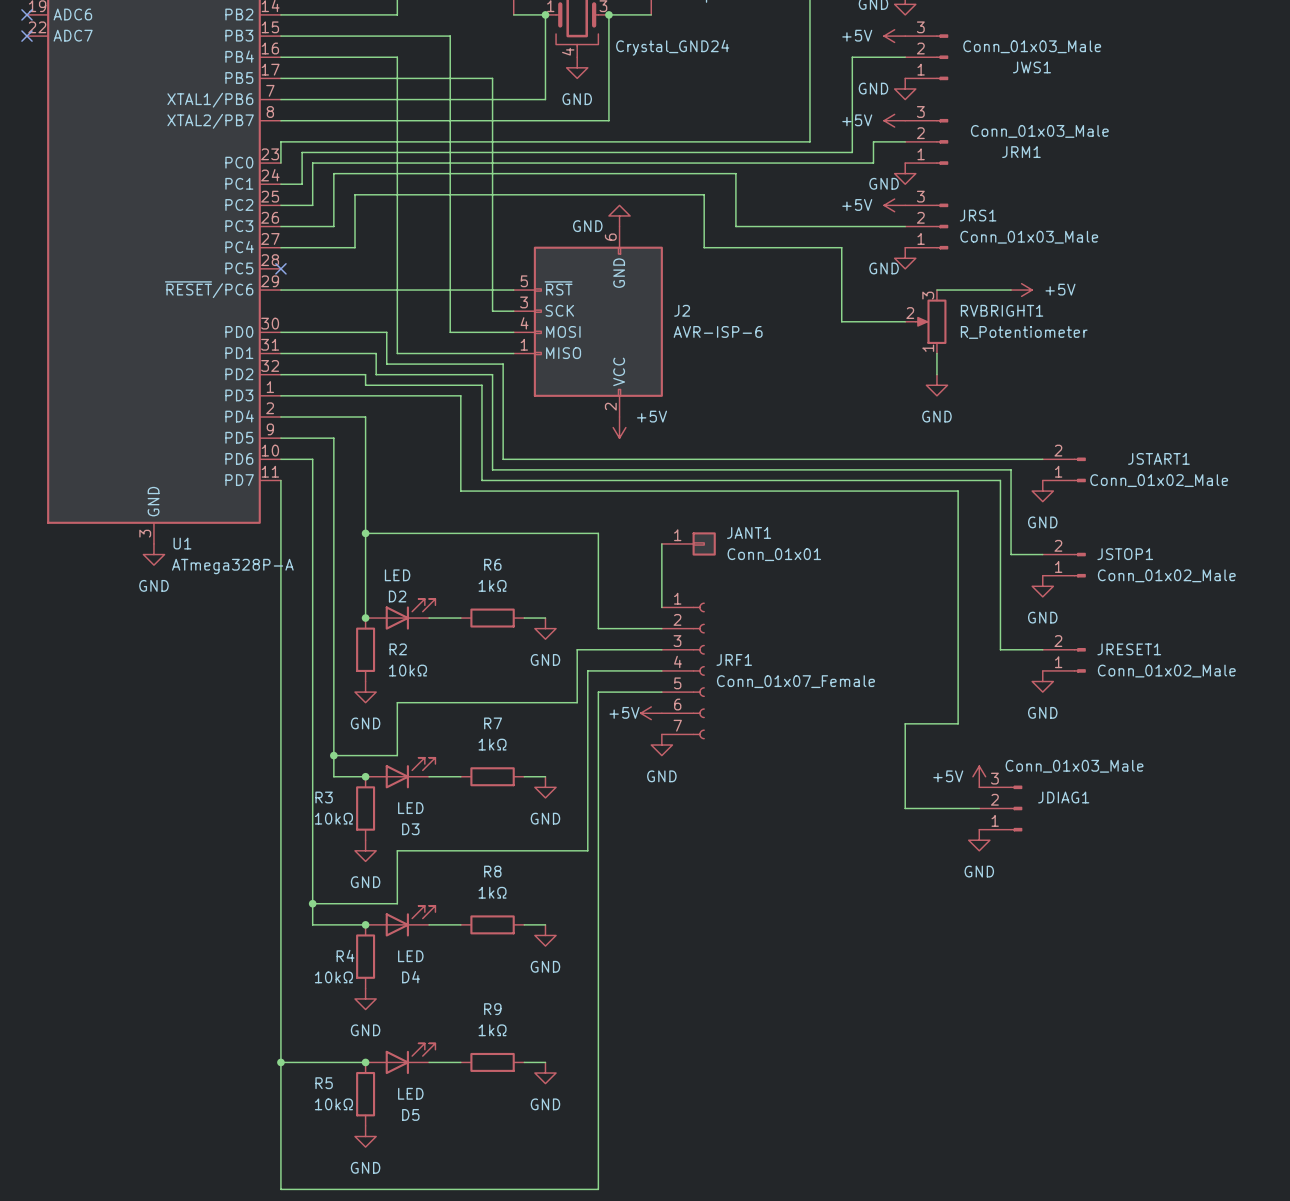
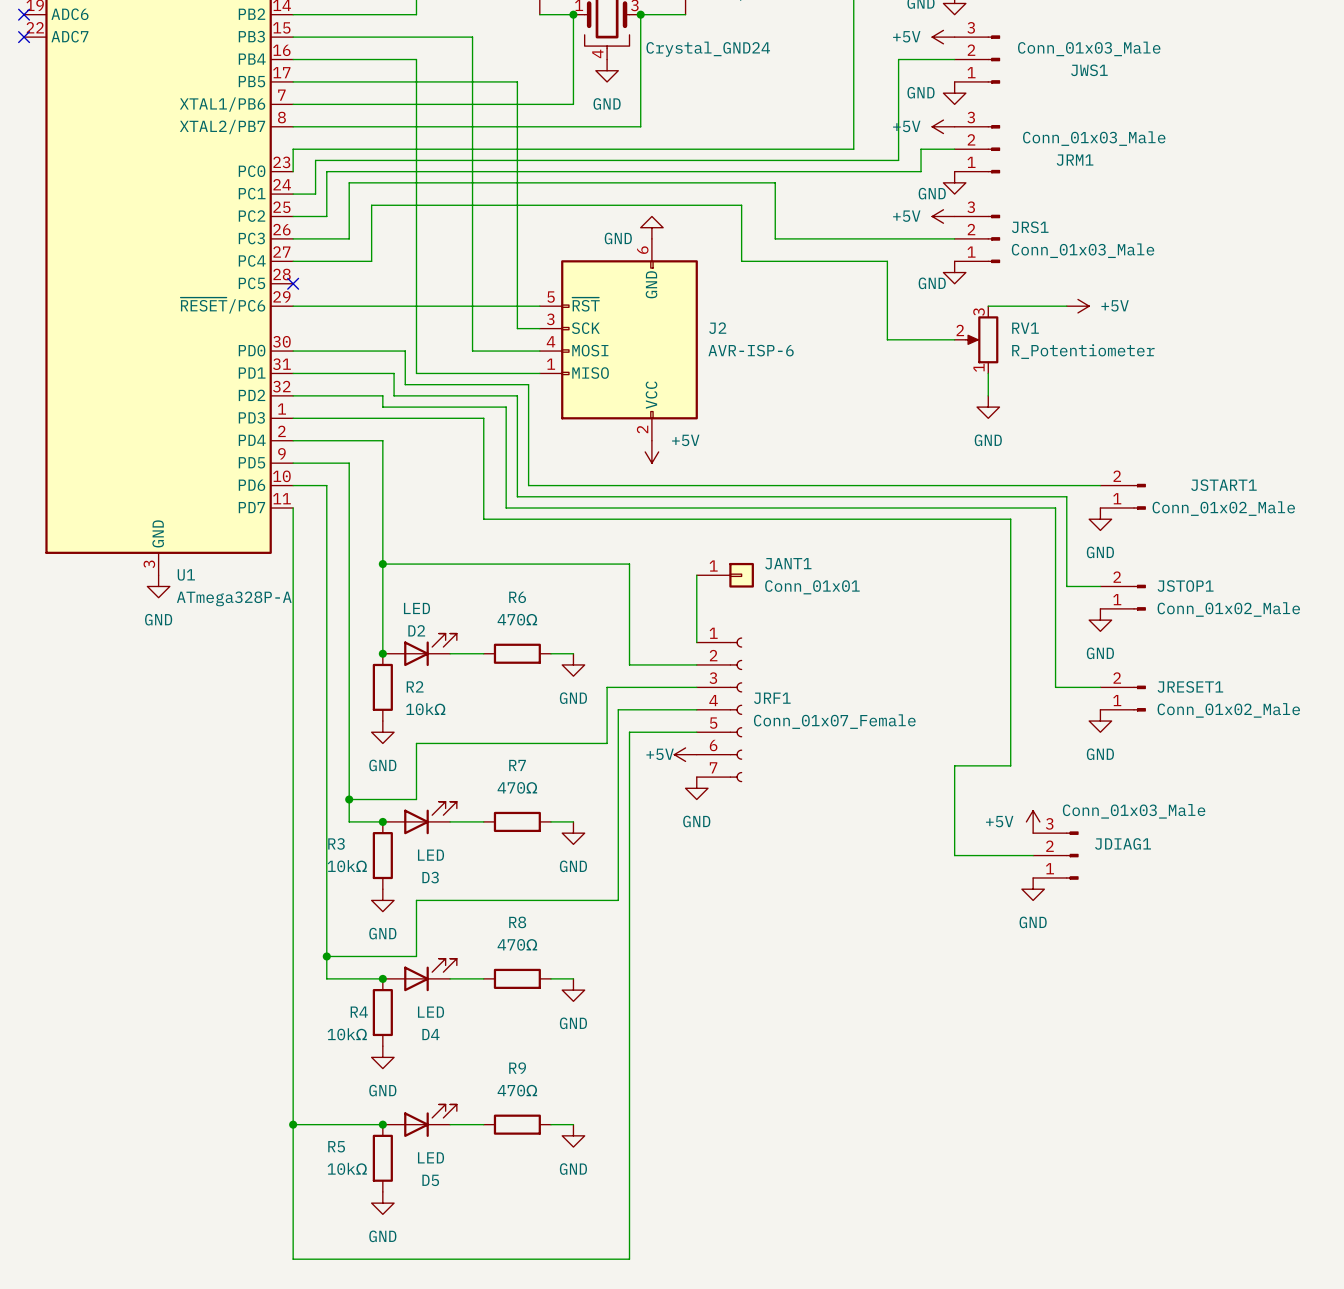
RVBRIGHT1 name: RVBRIGHT1 (1002, 310) -> RV1 (1025, 328)
R6 value: 1kΩ (492, 585) -> 470Ω (517, 619)
R7 value: 1kΩ (492, 744) -> 470Ω (517, 787)
R8 value: 1kΩ (492, 892) -> 470Ω (517, 944)
R9 value: 1kΩ (492, 1030) -> 470Ω (517, 1090)

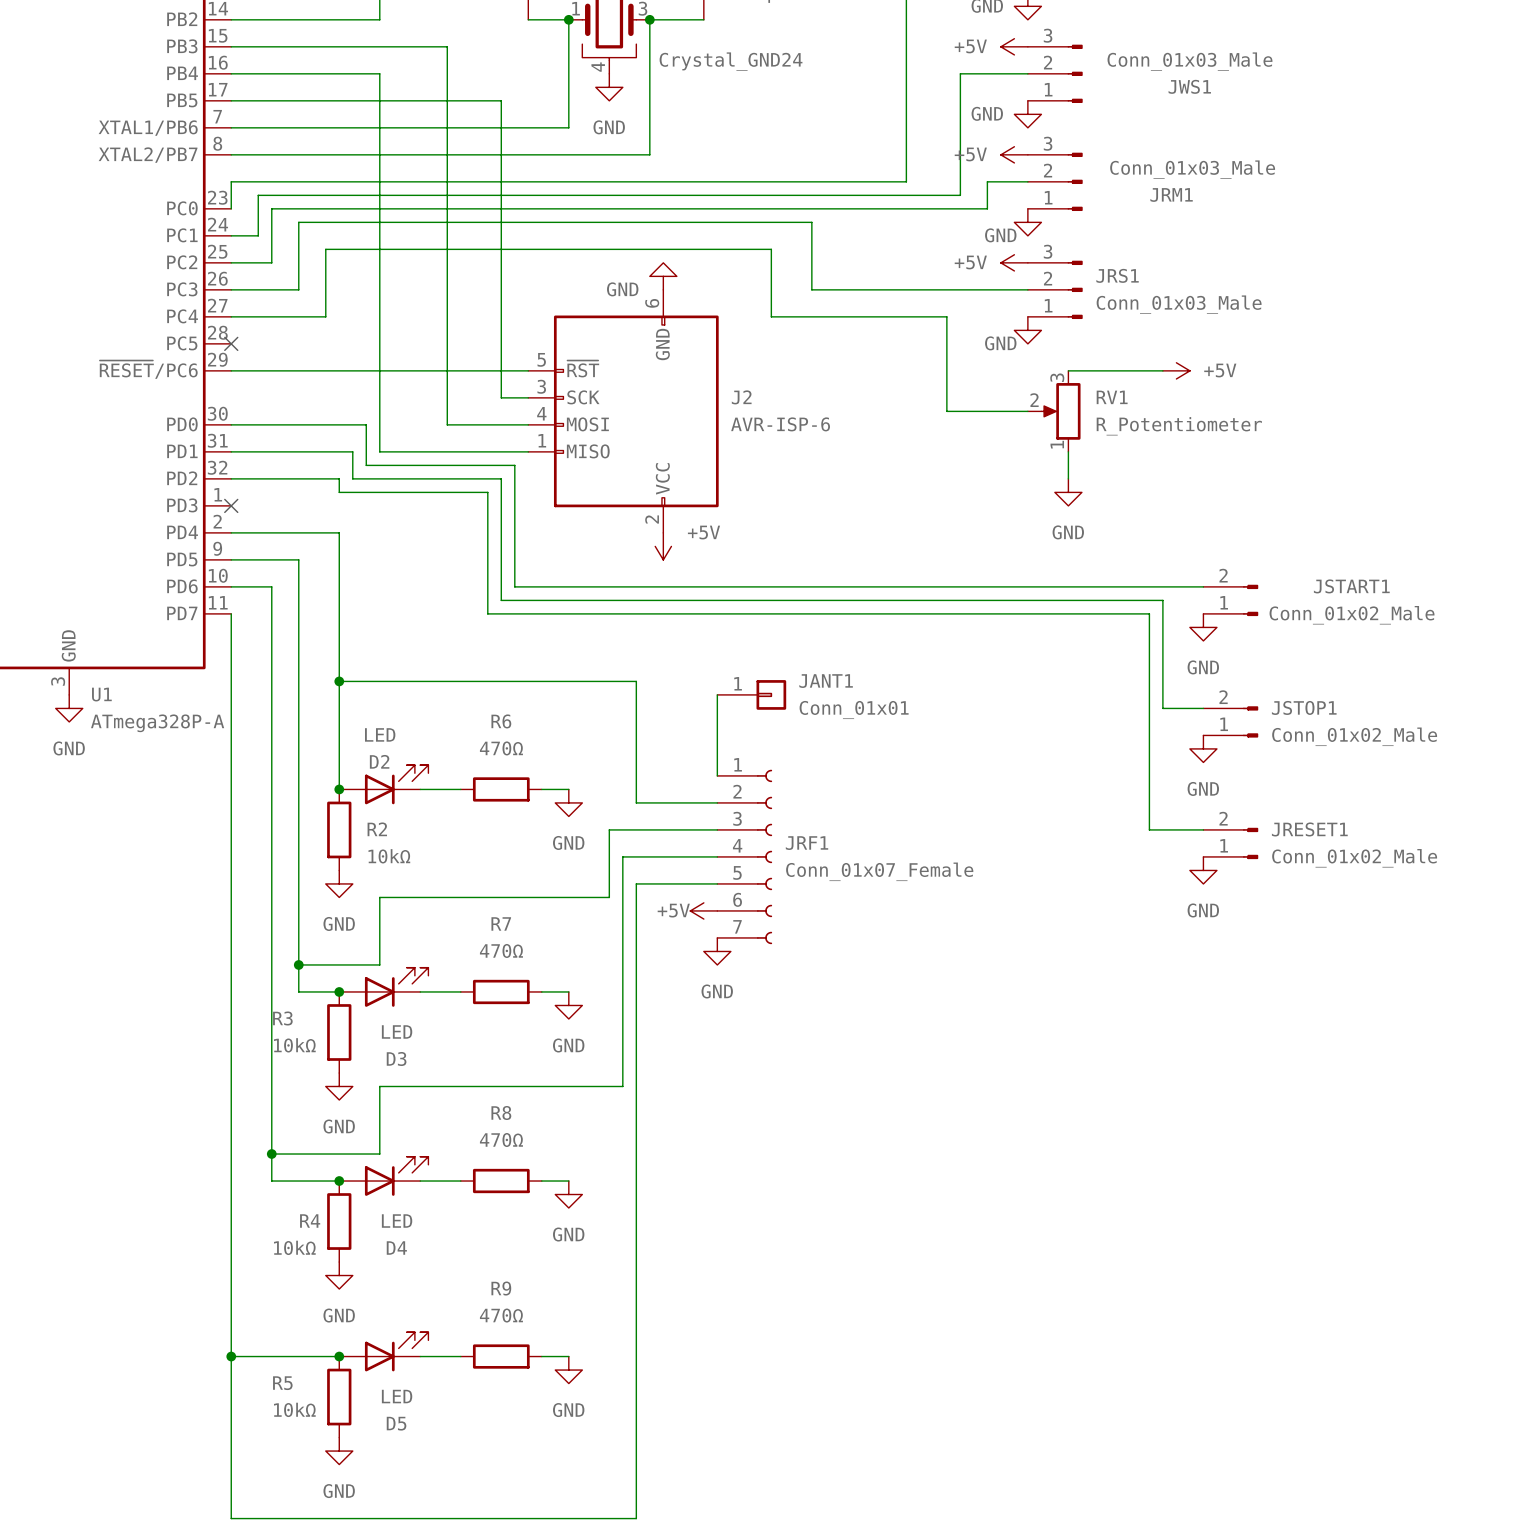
wire: (293, 418) (483, 418) (483, 519) (1010, 519) (1010, 765) (954, 765) (954, 855) (1033, 855) -> none
no-connect mark: none -> (231, 505)
power symbol: +5V (1033, 821) -> none
JDIAG1: Conn_01x03_Male (1055, 855) -> none
power symbol: GND (1033, 889) -> none

